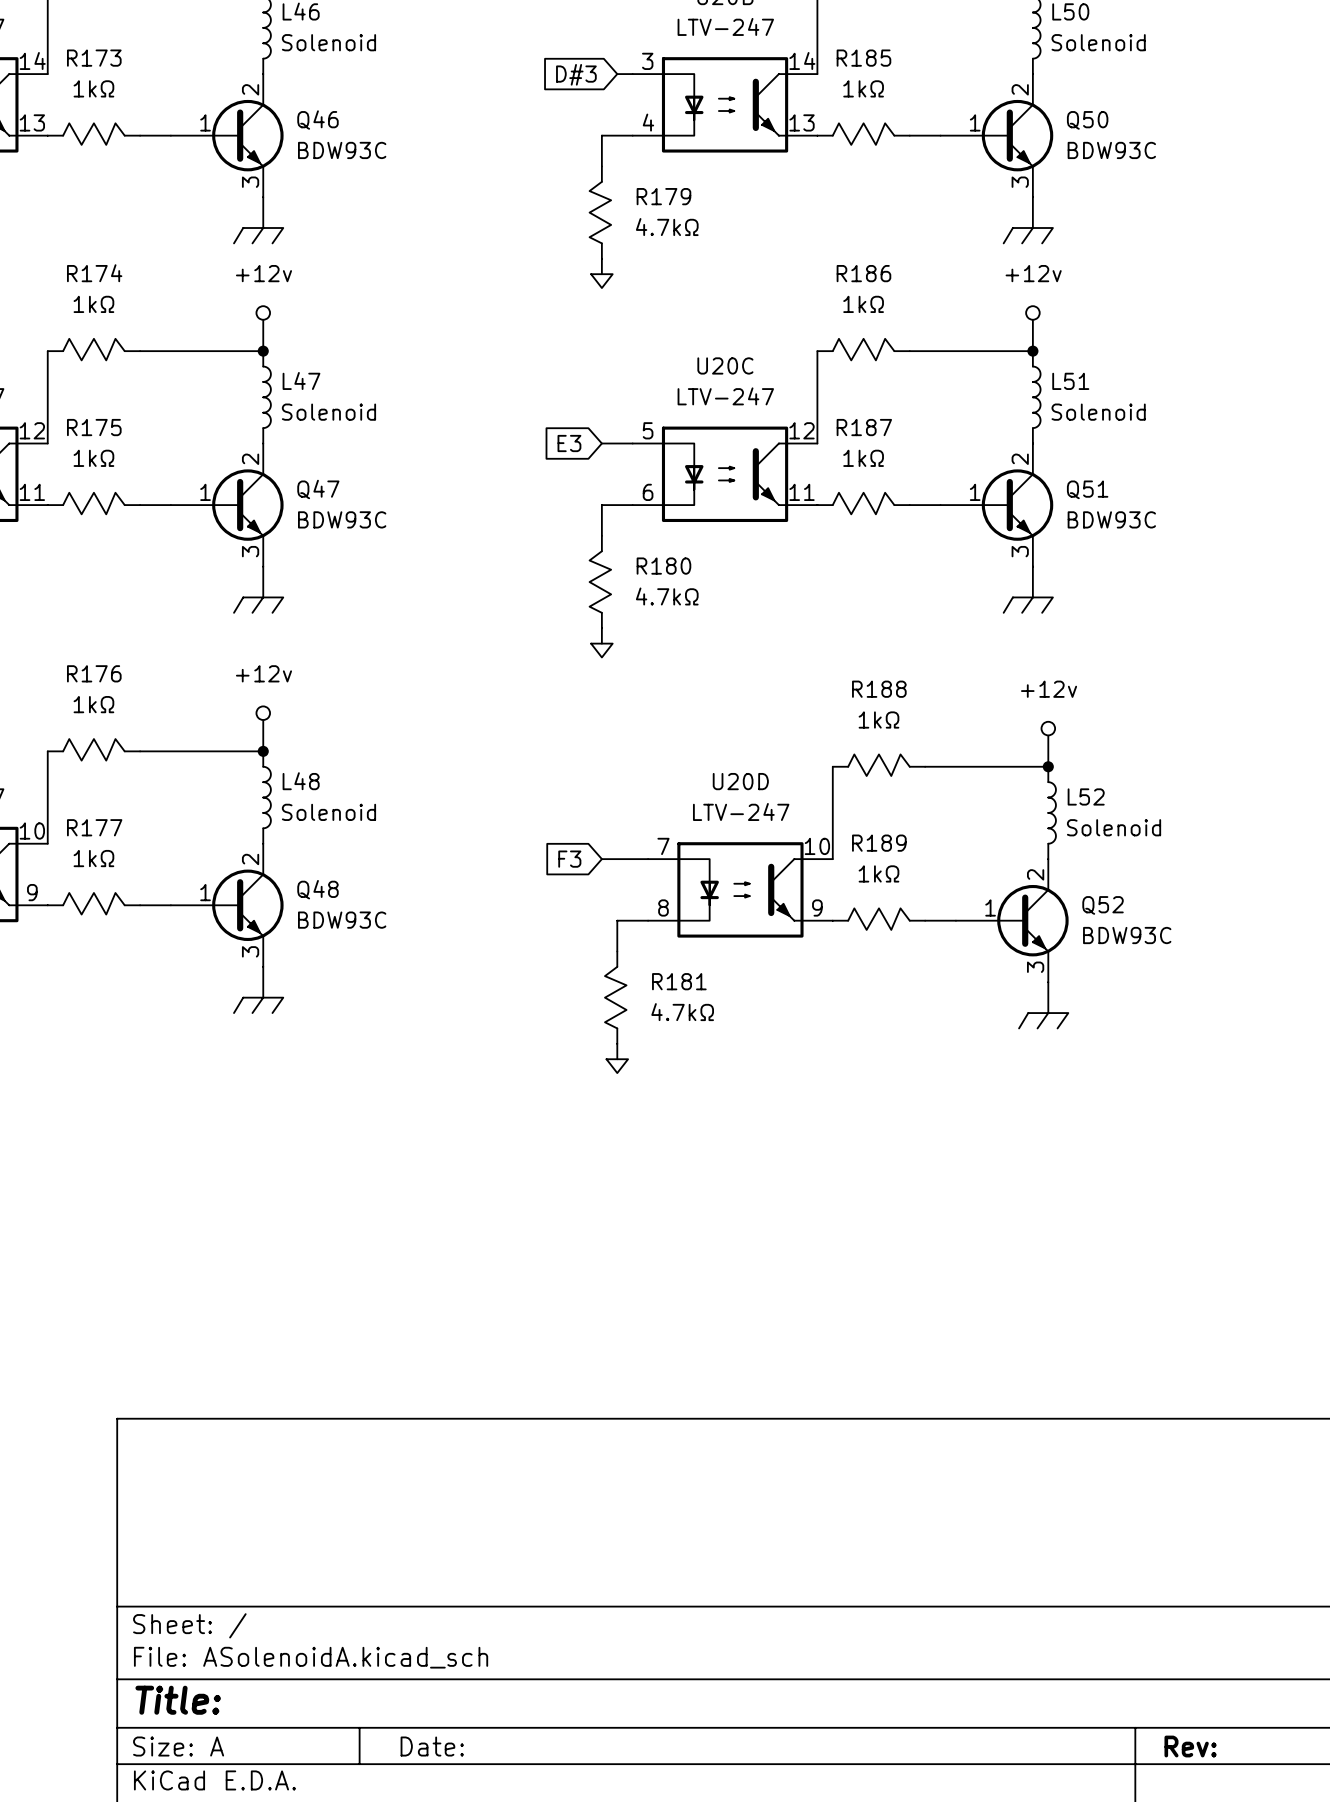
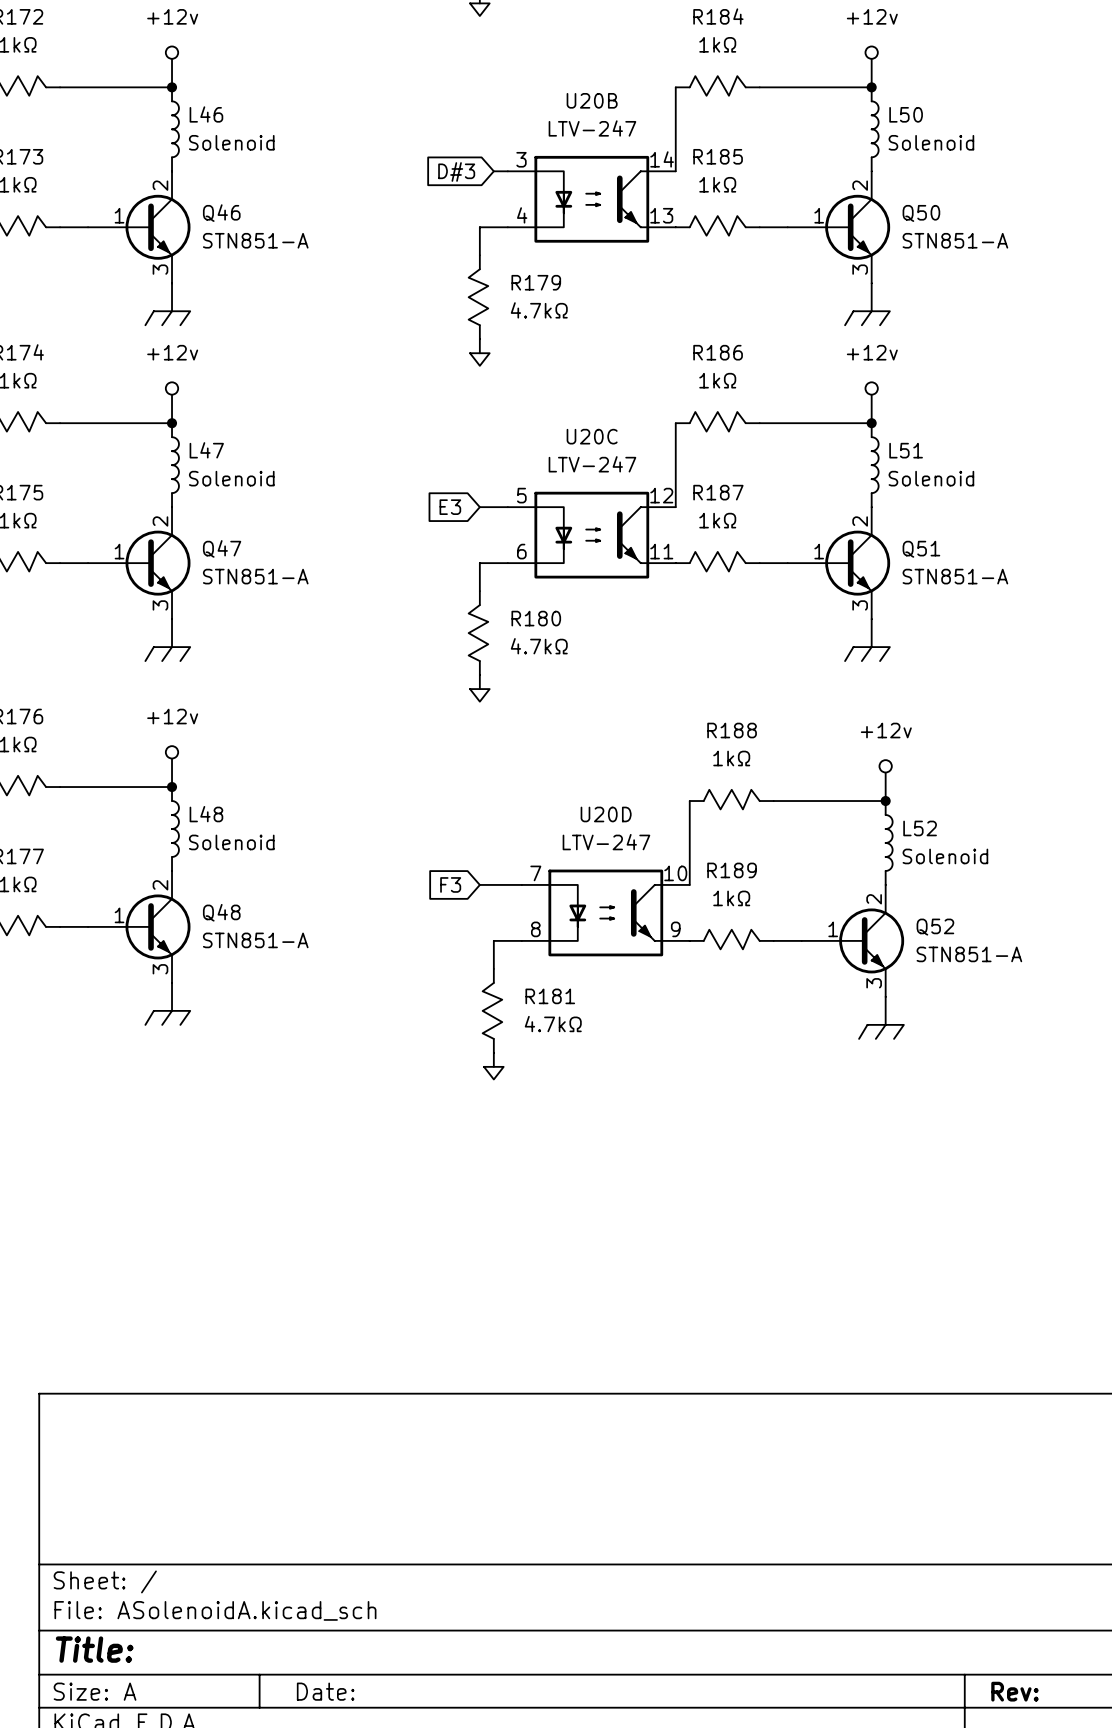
Q46 value: BDW93C (342, 150) -> STN851-A (255, 240)
Q50 value: BDW93C (1111, 150) -> STN851-A (955, 240)
Q47 value: BDW93C (342, 519) -> STN851-A (255, 576)
Q51 value: BDW93C (1111, 519) -> STN851-A (955, 576)
Q48 value: BDW93C (342, 920) -> STN851-A (255, 940)
Q52 value: BDW93C (1127, 935) -> STN851-A (969, 954)

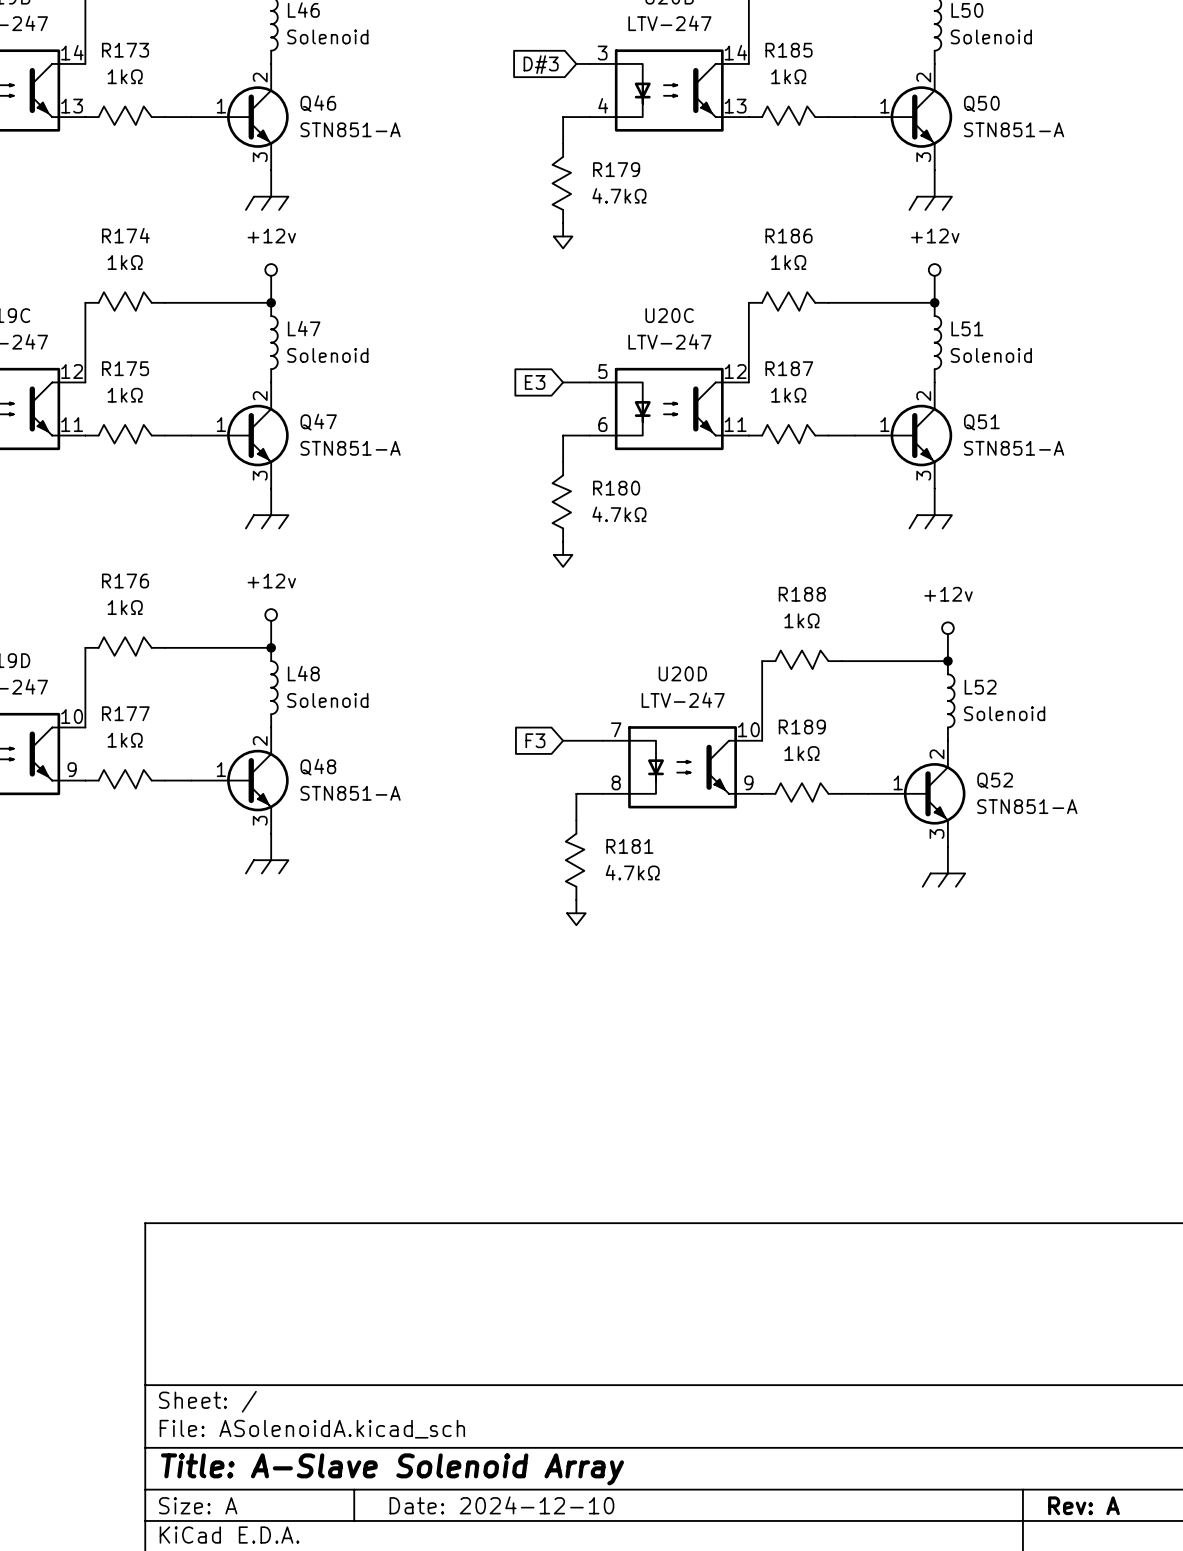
title block: Title: (94, 1649) -> Title: A-Slave Solenoid Array (392, 1469)
title block: Date: (325, 1691) -> Date: 2024-12-10 (501, 1505)
title block: Rev: (1014, 1691) -> Rev: A (1083, 1505)

